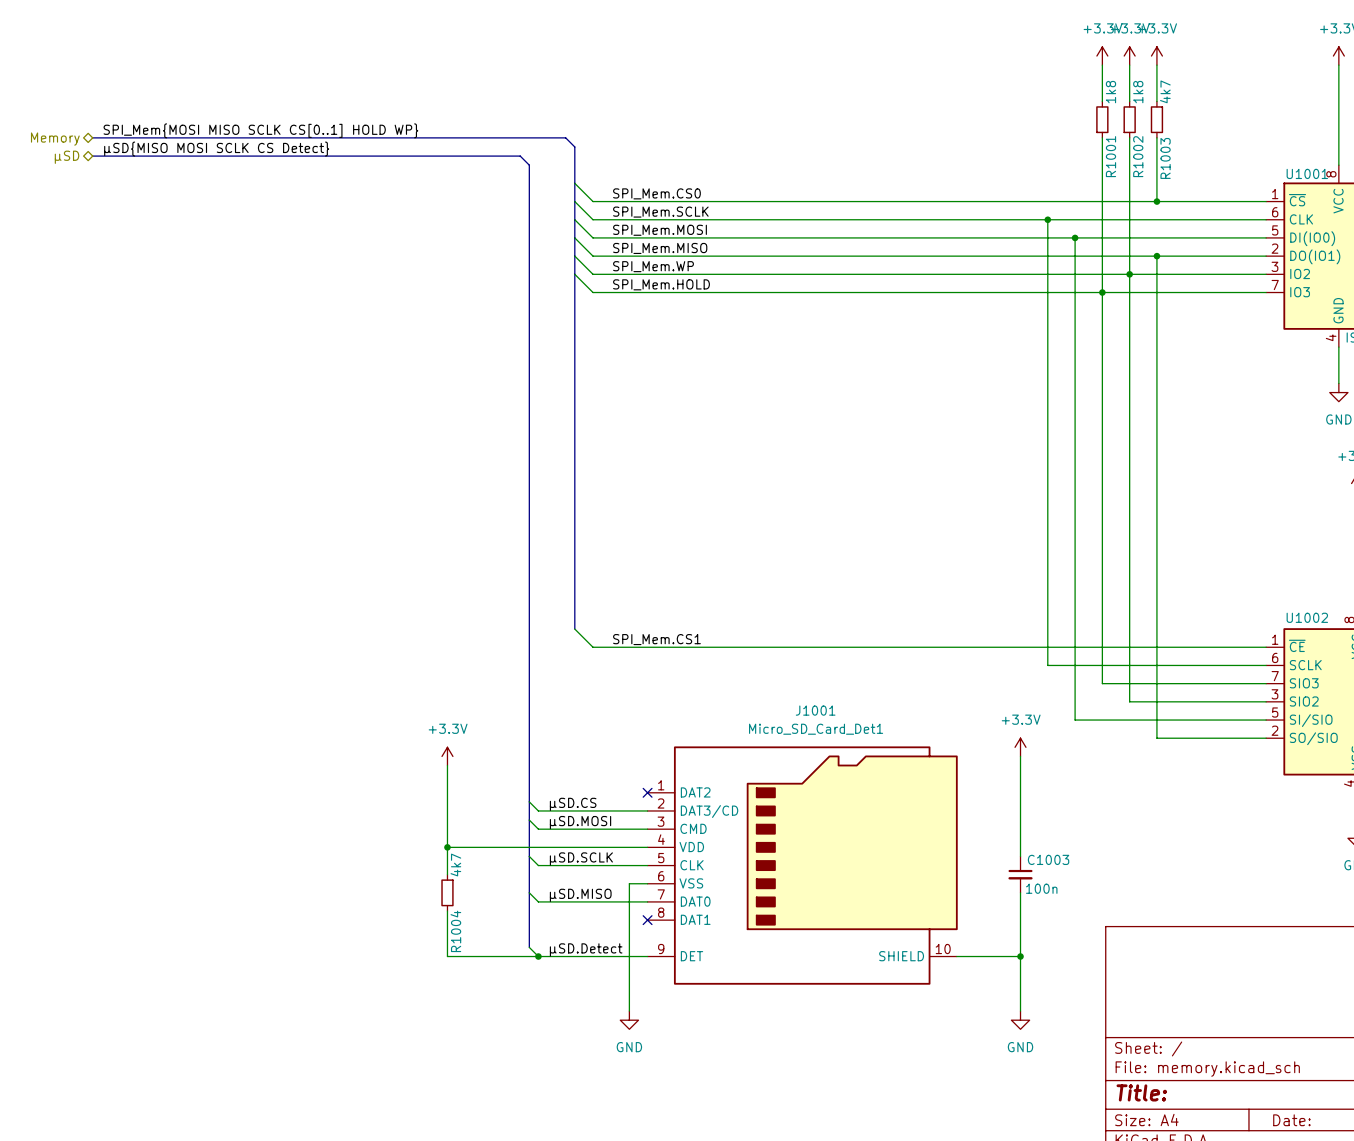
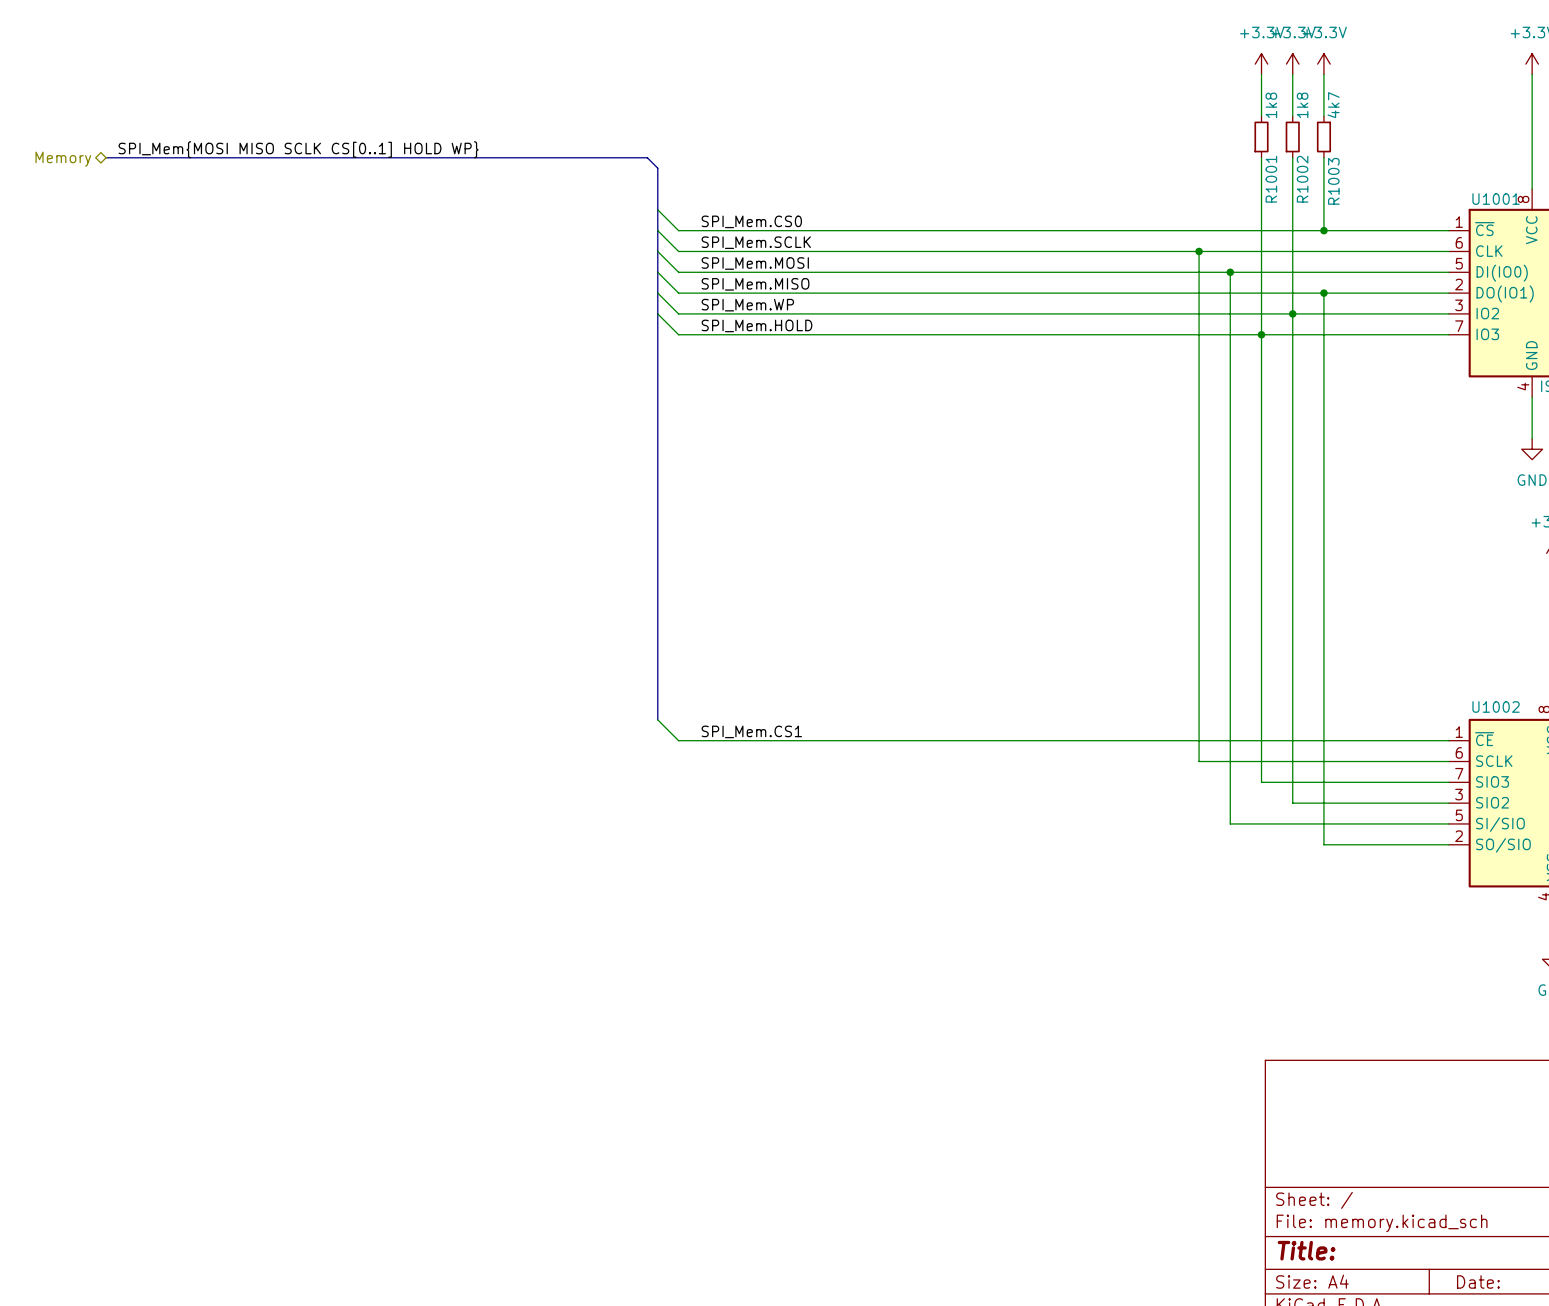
label: μSD{MISO MOSI SCLK CS Detect} (216, 149) -> none
bus: (92, 156) (520, 156) (529, 165) (529, 947) -> none
hierarchical label: μSD (67, 157) -> none
power symbol: +3.3V (1020, 747) -> none
power symbol: +3.3V (447, 756) -> none
wire: (1020, 756) (1020, 856) -> none
wire: (447, 765) (447, 874) -> none
no-connect mark: (647, 792) -> none
wire: (529, 801) (538, 810) (647, 810) -> none
label: μSD.CS (573, 804) -> none
wire: (529, 820) (538, 829) (647, 829) -> none
label: μSD.MOSI (580, 822) -> none
wire: (447, 847) (647, 847) -> none
junction: (447, 847) -> none
wire: (529, 856) (538, 865) (647, 865) -> none
label: μSD.SCLK (581, 858) -> none
J1001: Micro_SD_Card_Det1 (802, 865) -> none
C1003: 100n (1020, 874) -> none
wire: (647, 883) (629, 883) (629, 1011) -> none
R1004: 4k7 (447, 892) -> none
wire: (529, 892) (538, 901) (647, 901) -> none
wire: (1020, 892) (1020, 1011) -> none
label: μSD.MISO (580, 895) -> none
wire: (447, 911) (447, 956) (647, 956) -> none
no-connect mark: (647, 920) -> none
wire: (529, 947) (538, 956) -> none
label: μSD.Detect (586, 949) -> none
junction: (538, 956) -> none
wire: (956, 956) (1020, 956) -> none
junction: (1020, 956) -> none
power symbol: GND (629, 1020) -> none
power symbol: GND (1020, 1020) -> none

